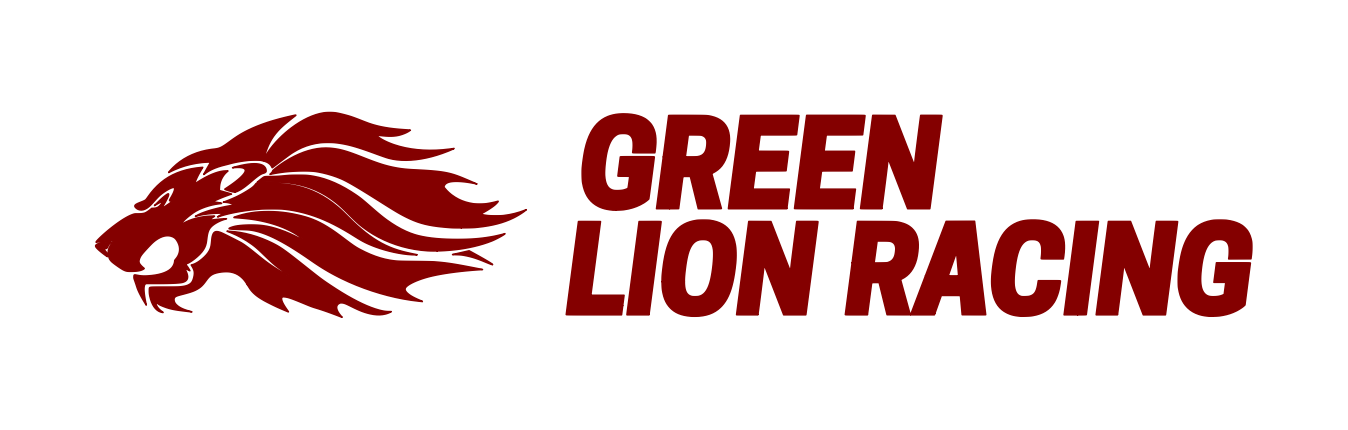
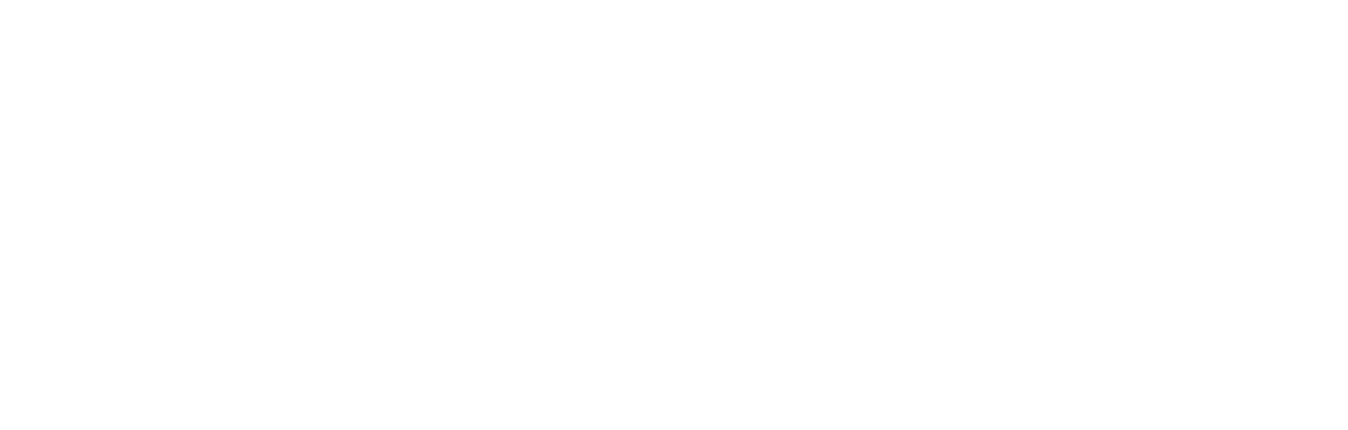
power symbol: (673, 214) -> none

